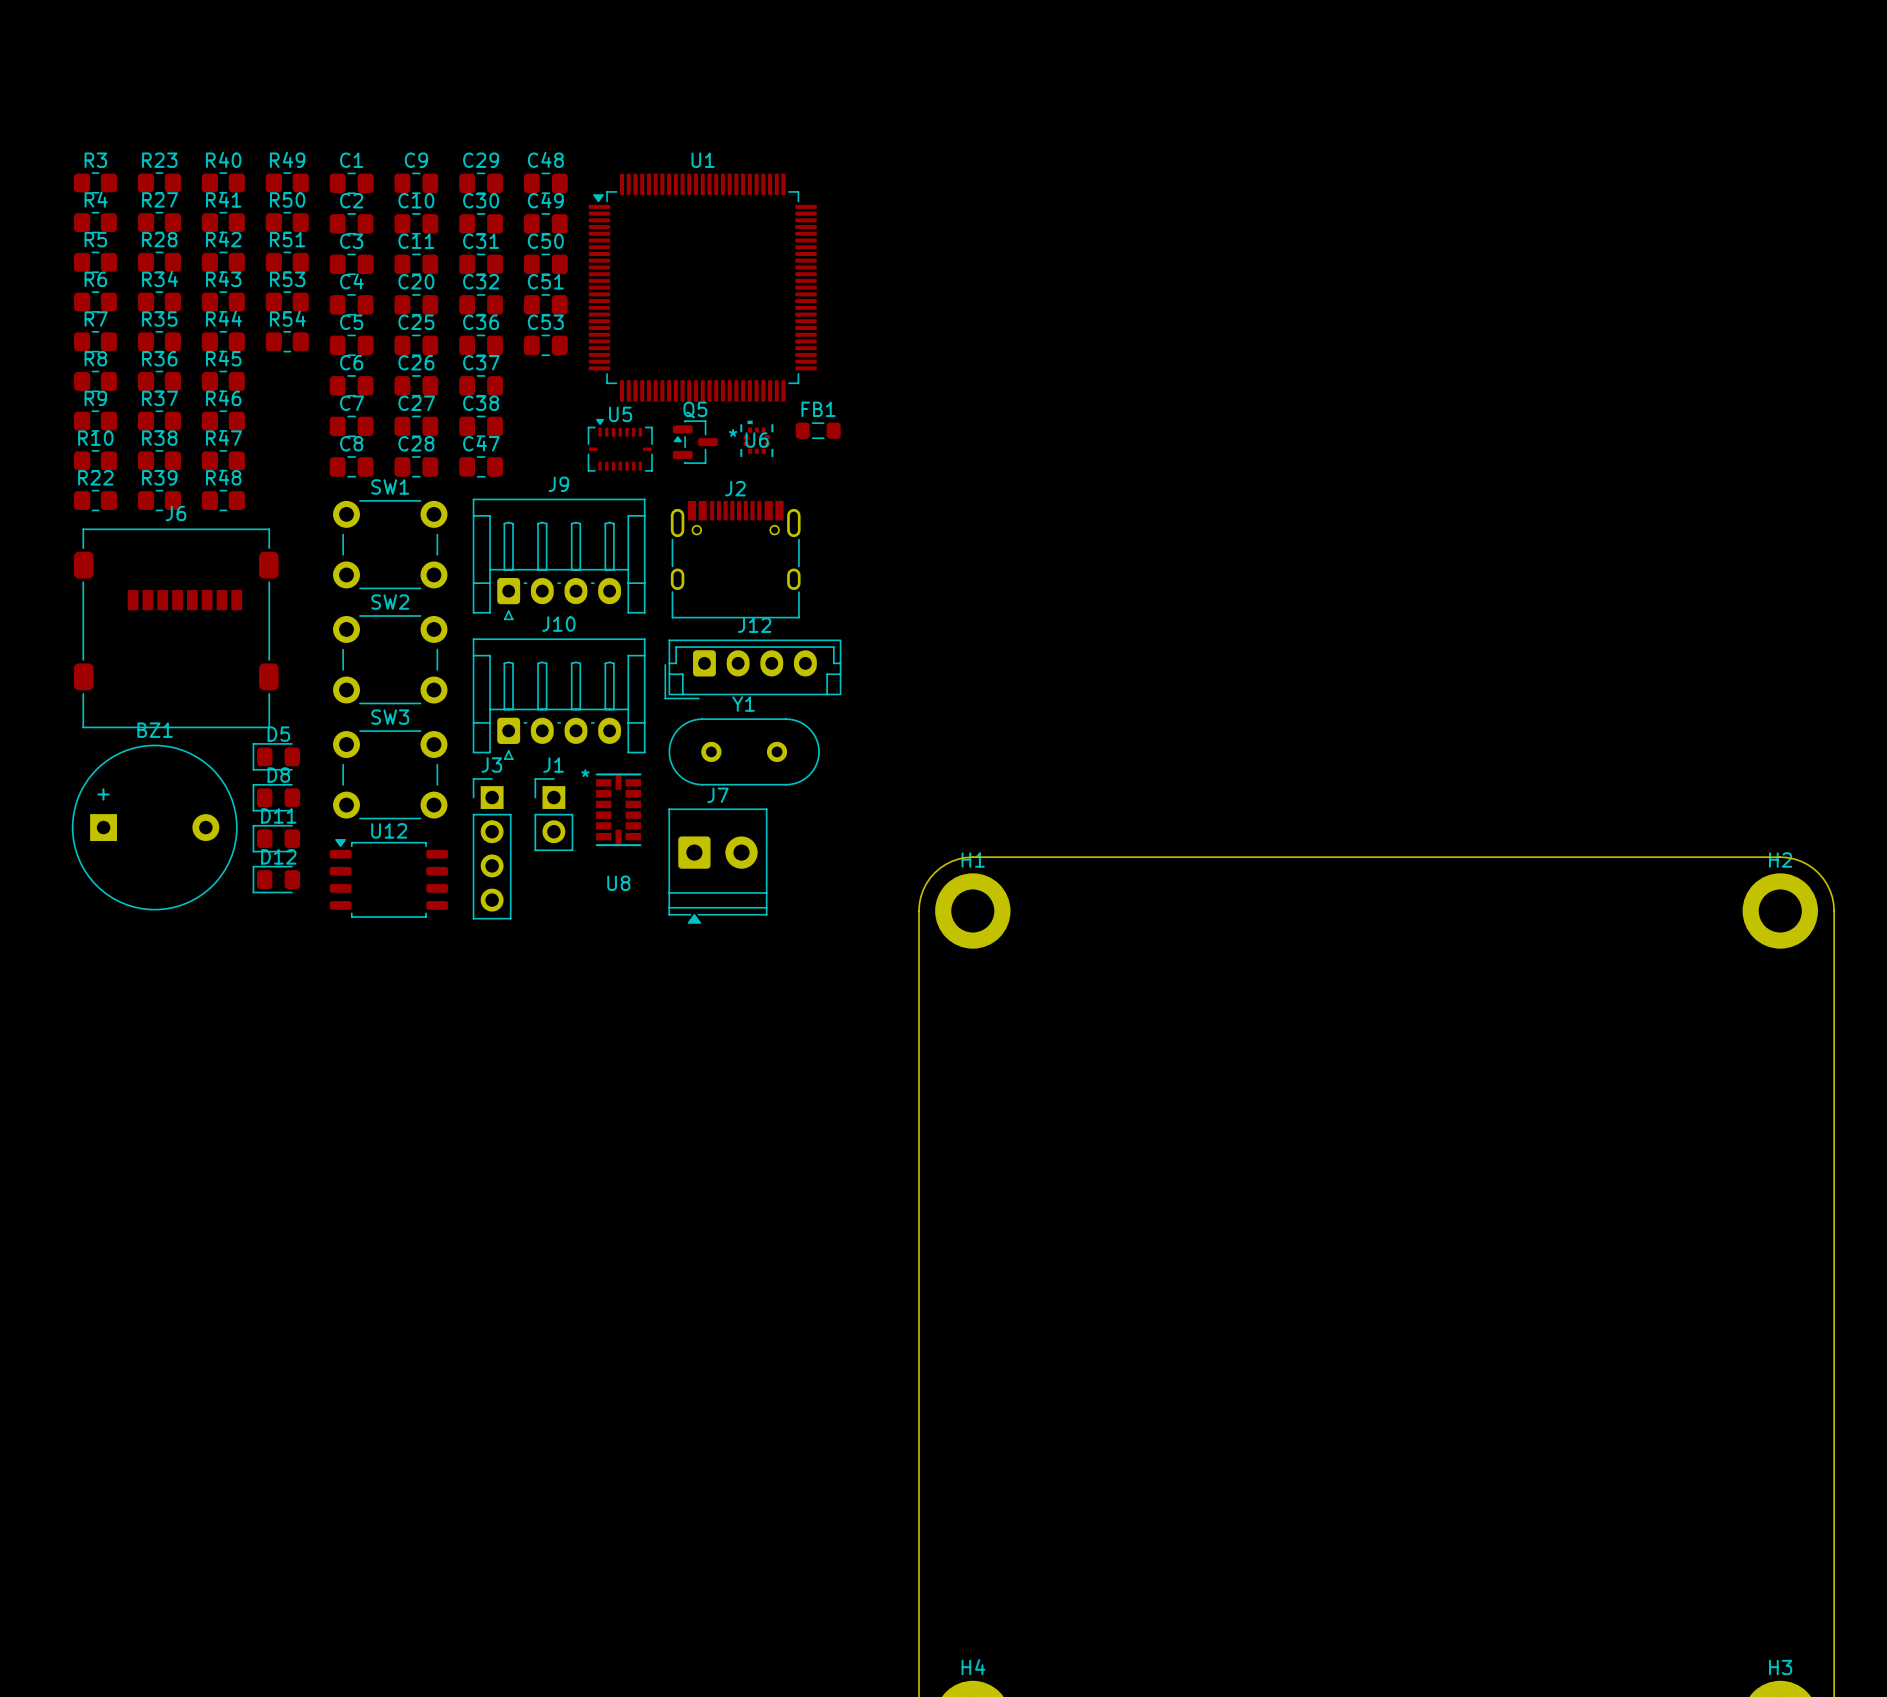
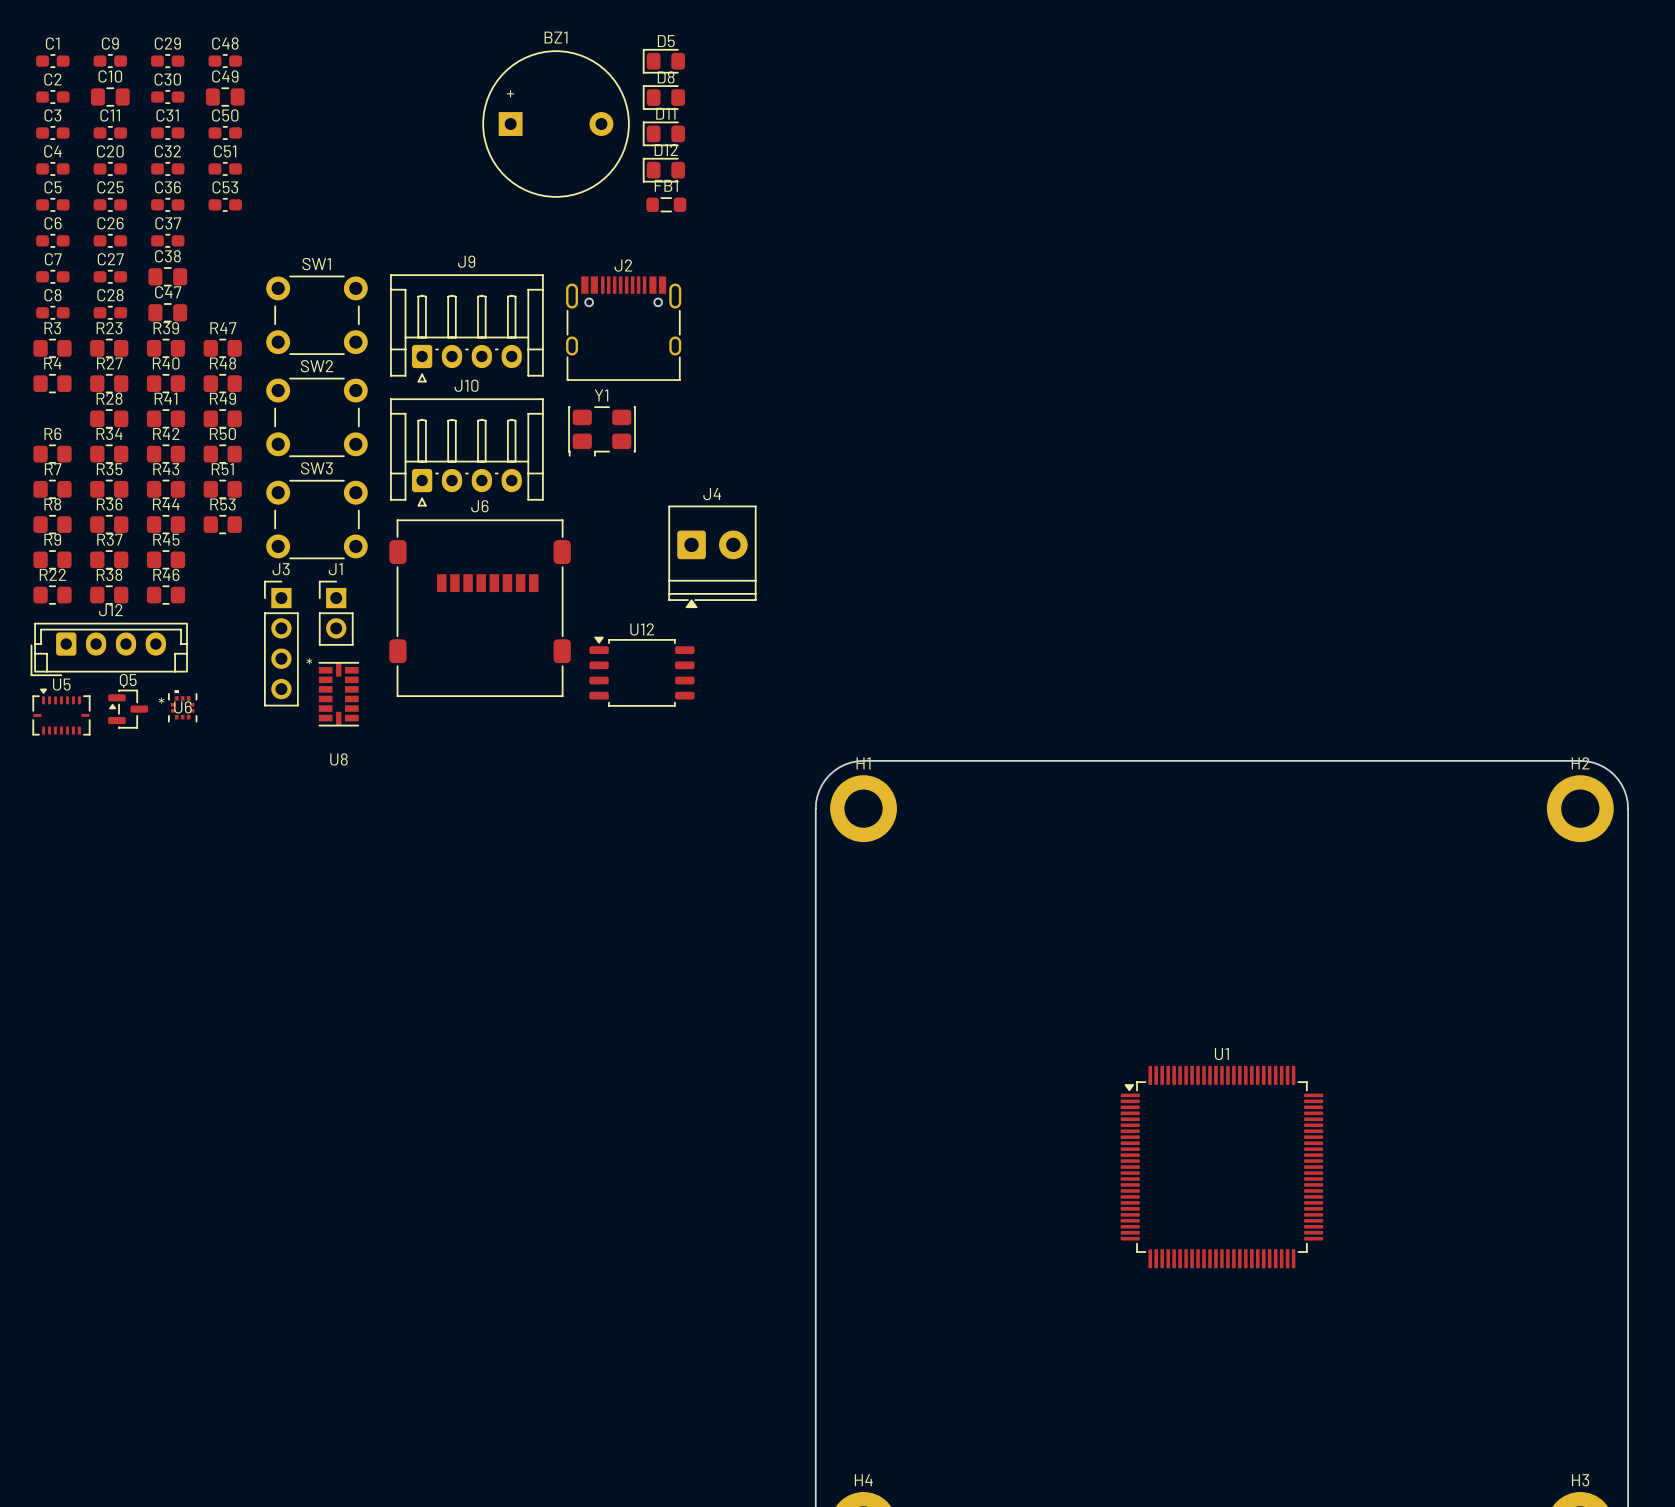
C1 footprint: [329, 172, 374, 195] -> [36, 54, 70, 68]
C9 footprint: [394, 172, 439, 195] -> [93, 54, 128, 68]
C29 footprint: [459, 172, 503, 195] -> [151, 54, 185, 68]
C48 footprint: [523, 172, 568, 195] -> [208, 54, 242, 68]
R3 position: (95, 182) -> (52, 348)
R23 position: (159, 182) -> (109, 348)
R40 position: (223, 182) -> (165, 383)
R49 position: (287, 182) -> (222, 418)
C2 footprint: [329, 213, 374, 235] -> [36, 90, 70, 104]
C30 footprint: [459, 213, 503, 235] -> [151, 90, 185, 104]
R4 position: (95, 222) -> (52, 383)
R27 position: (159, 222) -> (109, 383)
R41 position: (223, 222) -> (165, 418)
R50 position: (287, 222) -> (222, 454)
C10 position: (416, 223) -> (110, 97)
C49 position: (545, 223) -> (225, 97)
C3 footprint: [329, 253, 374, 276] -> [36, 126, 70, 140]
C11 footprint: [394, 253, 439, 276] -> [93, 126, 128, 140]
C31 footprint: [459, 253, 503, 276] -> [151, 126, 185, 140]
C50 footprint: [523, 253, 568, 276] -> [208, 126, 242, 140]
R5: (95, 262) -> none
R28 position: (159, 262) -> (109, 418)
R42 position: (223, 262) -> (165, 454)
R51 position: (287, 262) -> (222, 489)
U1 position: (702, 287) -> (1221, 1167)
C4 footprint: [329, 294, 374, 316] -> [36, 162, 70, 176]
C20 footprint: [394, 294, 439, 316] -> [93, 162, 128, 176]
C32 footprint: [459, 294, 503, 316] -> [151, 162, 185, 176]
C51 footprint: [523, 294, 568, 316] -> [208, 162, 242, 176]
R6 position: (95, 302) -> (52, 454)
R34 position: (159, 302) -> (109, 454)
R43 position: (223, 302) -> (165, 489)
R53 position: (287, 302) -> (222, 524)
C5 footprint: [329, 334, 374, 357] -> [36, 198, 70, 212]
C25 footprint: [394, 334, 439, 357] -> [93, 198, 128, 212]
C36 footprint: [459, 334, 503, 357] -> [151, 198, 185, 212]
C53 footprint: [523, 334, 568, 357] -> [208, 198, 242, 212]
R7 position: (95, 341) -> (52, 489)
R35 position: (159, 341) -> (109, 489)
R44 position: (223, 341) -> (165, 524)
R54: (287, 341) -> none
C6 footprint: [329, 375, 374, 397] -> [36, 234, 70, 248]
C26 footprint: [394, 375, 439, 397] -> [93, 234, 128, 248]
C37 footprint: [459, 375, 503, 397] -> [151, 234, 185, 248]
R8 position: (95, 381) -> (52, 524)
R36 position: (159, 381) -> (109, 524)
R45 position: (223, 381) -> (165, 559)
C7 footprint: [329, 415, 374, 438] -> [36, 270, 70, 284]
C27 footprint: [394, 415, 439, 438] -> [93, 270, 128, 284]
R9 position: (95, 421) -> (52, 559)
R37 position: (159, 421) -> (109, 559)
R46 position: (223, 421) -> (165, 595)
C38 position: (481, 426) -> (167, 276)
FB1 position: (818, 430) -> (666, 204)
U6 position: (756, 438) -> (182, 706)
Q5 position: (695, 442) -> (128, 709)
U5 position: (620, 445) -> (61, 711)
C8 footprint: [329, 456, 374, 478] -> [36, 305, 70, 320]
C28 footprint: [394, 456, 439, 478] -> [93, 305, 128, 320]
R10: (95, 460) -> none
R38 position: (159, 460) -> (109, 595)
R47 position: (223, 460) -> (222, 348)
C47 position: (481, 466) -> (167, 312)
R22 position: (95, 500) -> (52, 595)
R39 position: (159, 500) -> (165, 348)
R48 position: (223, 500) -> (222, 383)
SW1 position: (390, 544) -> (316, 315)
J9 position: (559, 559) -> (466, 328)
J2 position: (735, 559) -> (623, 328)
J4: none -> (712, 556)
J6 position: (176, 628) -> (480, 608)
SW2 position: (390, 659) -> (316, 417)
J12 position: (752, 669) -> (109, 649)
J10 position: (559, 699) -> (466, 452)
Y1 footprint: [668, 718, 820, 786] -> [568, 406, 636, 457]
D5 position: (276, 756) -> (663, 61)
SW3 position: (390, 774) -> (316, 519)
D8 position: (276, 797) -> (663, 97)
U8 position: (618, 809) -> (338, 694)
J1 position: (553, 814) -> (336, 613)
BZ1 position: (154, 827) -> (556, 124)
D11 position: (276, 838) -> (663, 133)
J3 position: (492, 848) -> (281, 643)
J7: (717, 866) -> none
U12 position: (388, 878) -> (641, 671)
D12 position: (276, 879) -> (663, 170)

